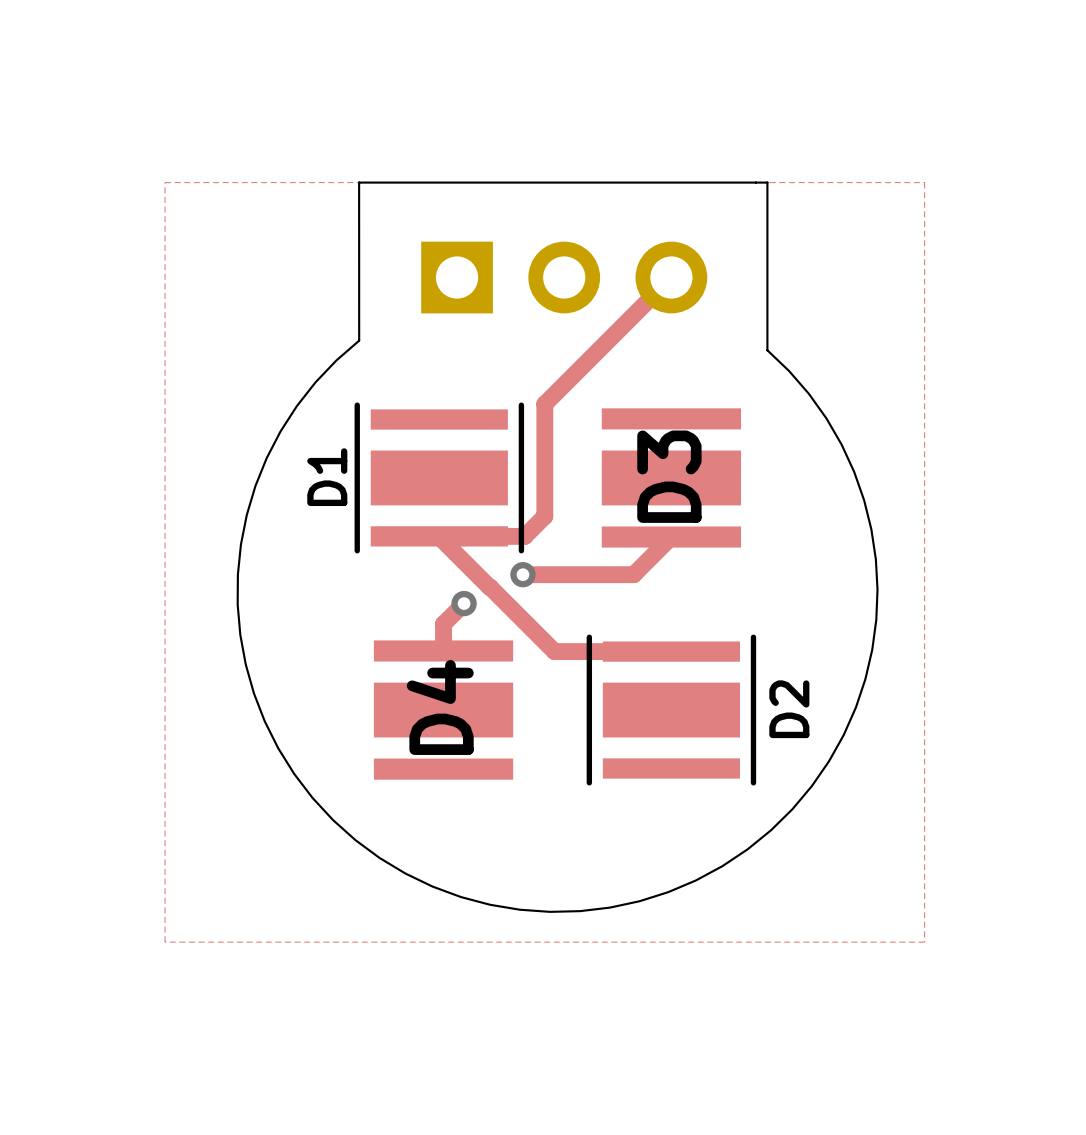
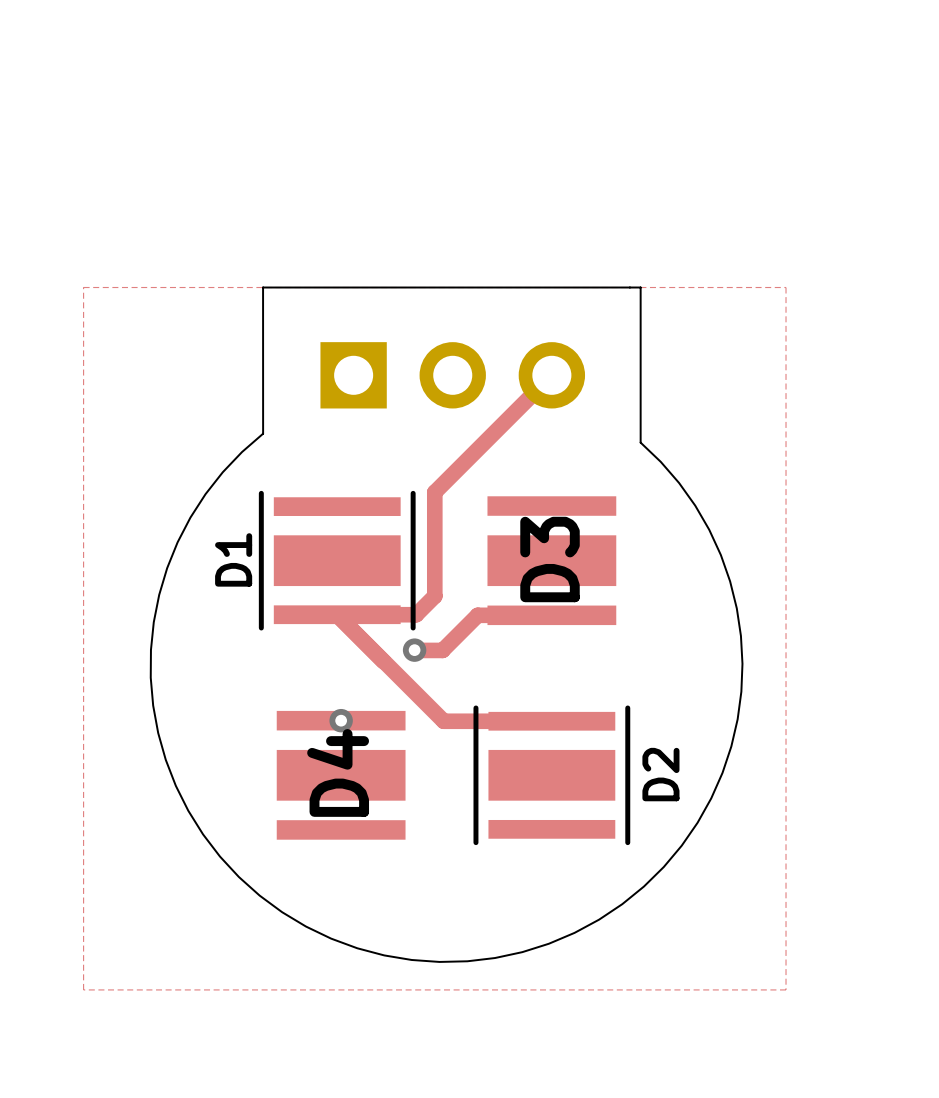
track: (671, 537) (633, 574) (522, 574) -> (551, 615) (477, 615) (442, 650) (415, 650)
track: (464, 603) (443, 624) (443, 650) -> none
via position: (464, 603) -> (341, 720)

